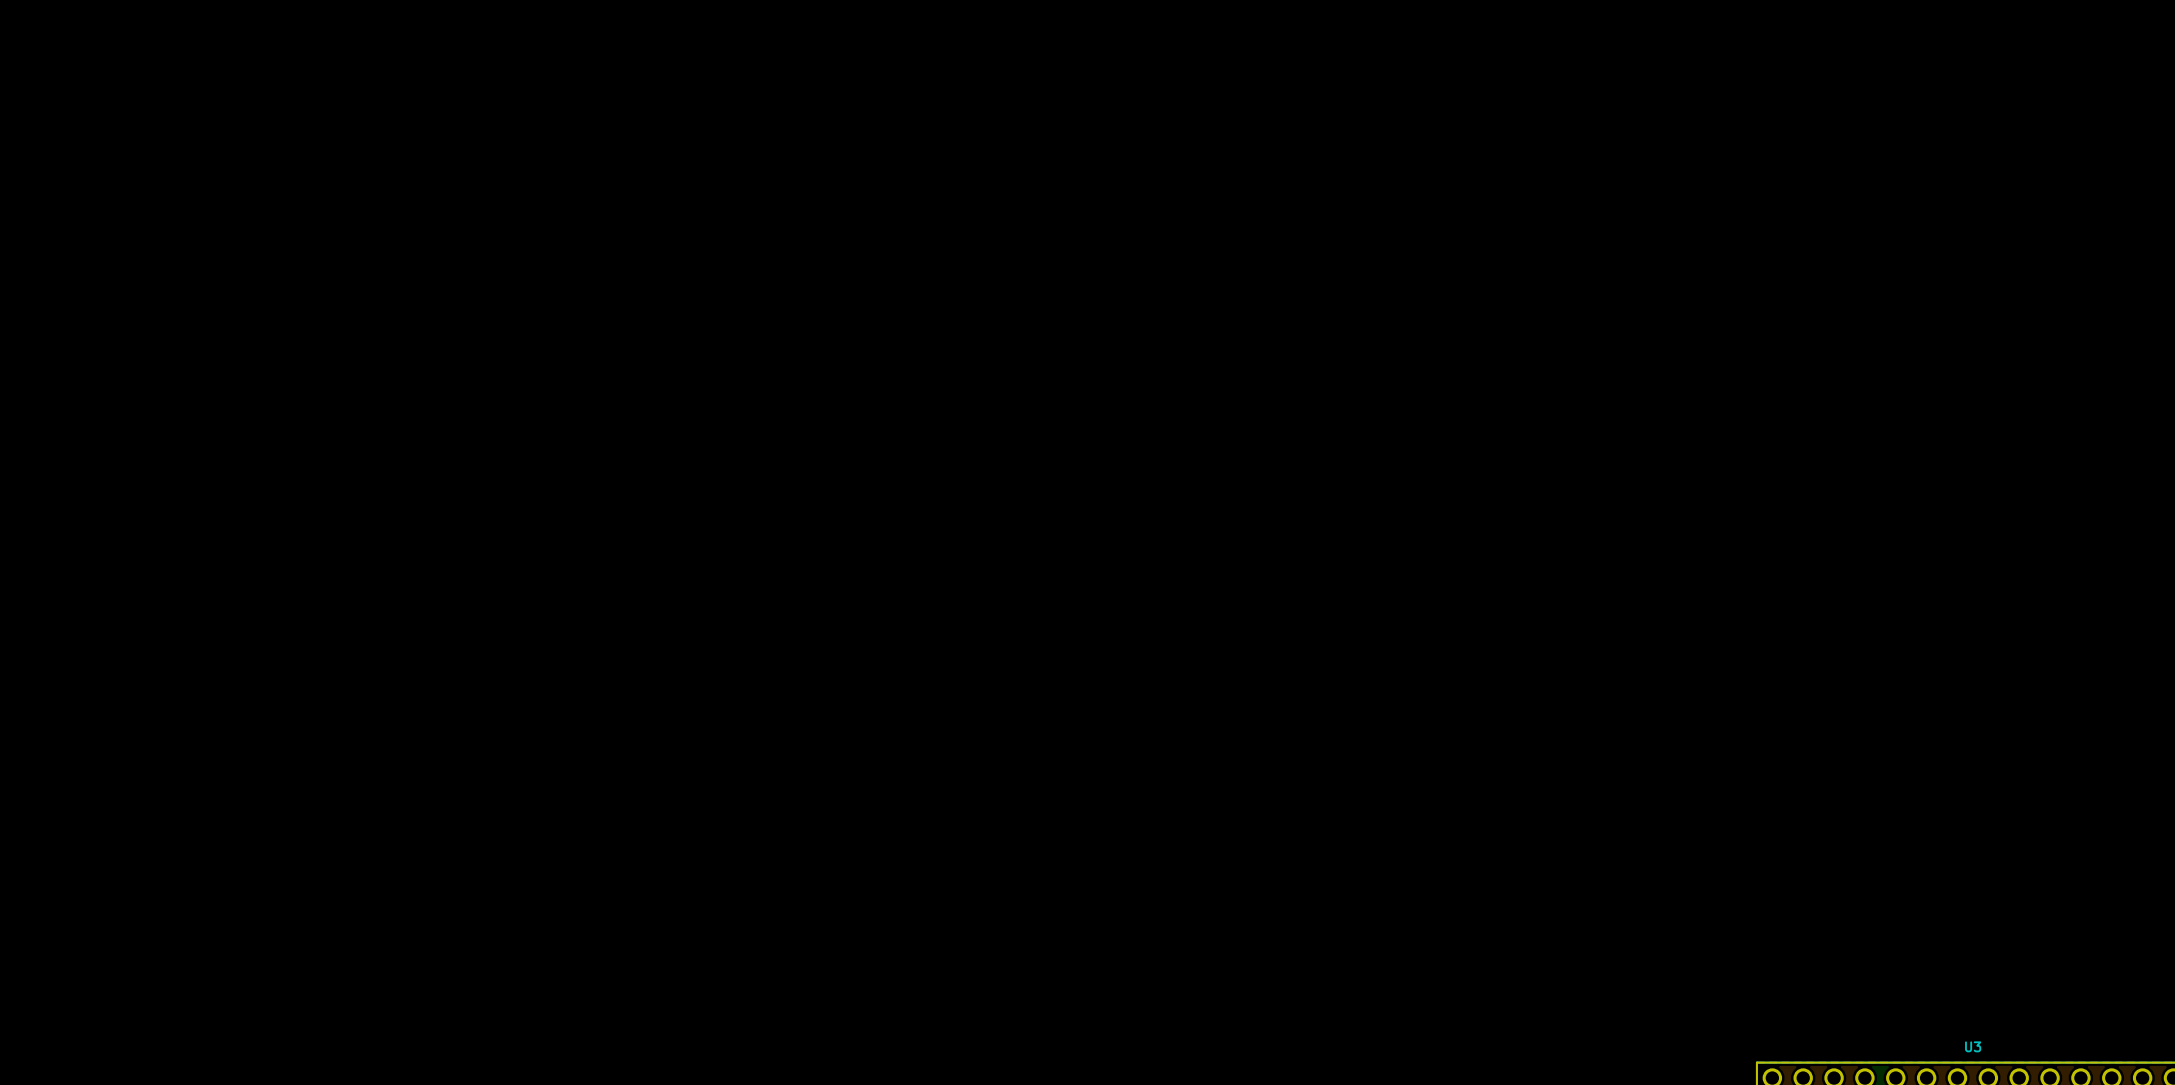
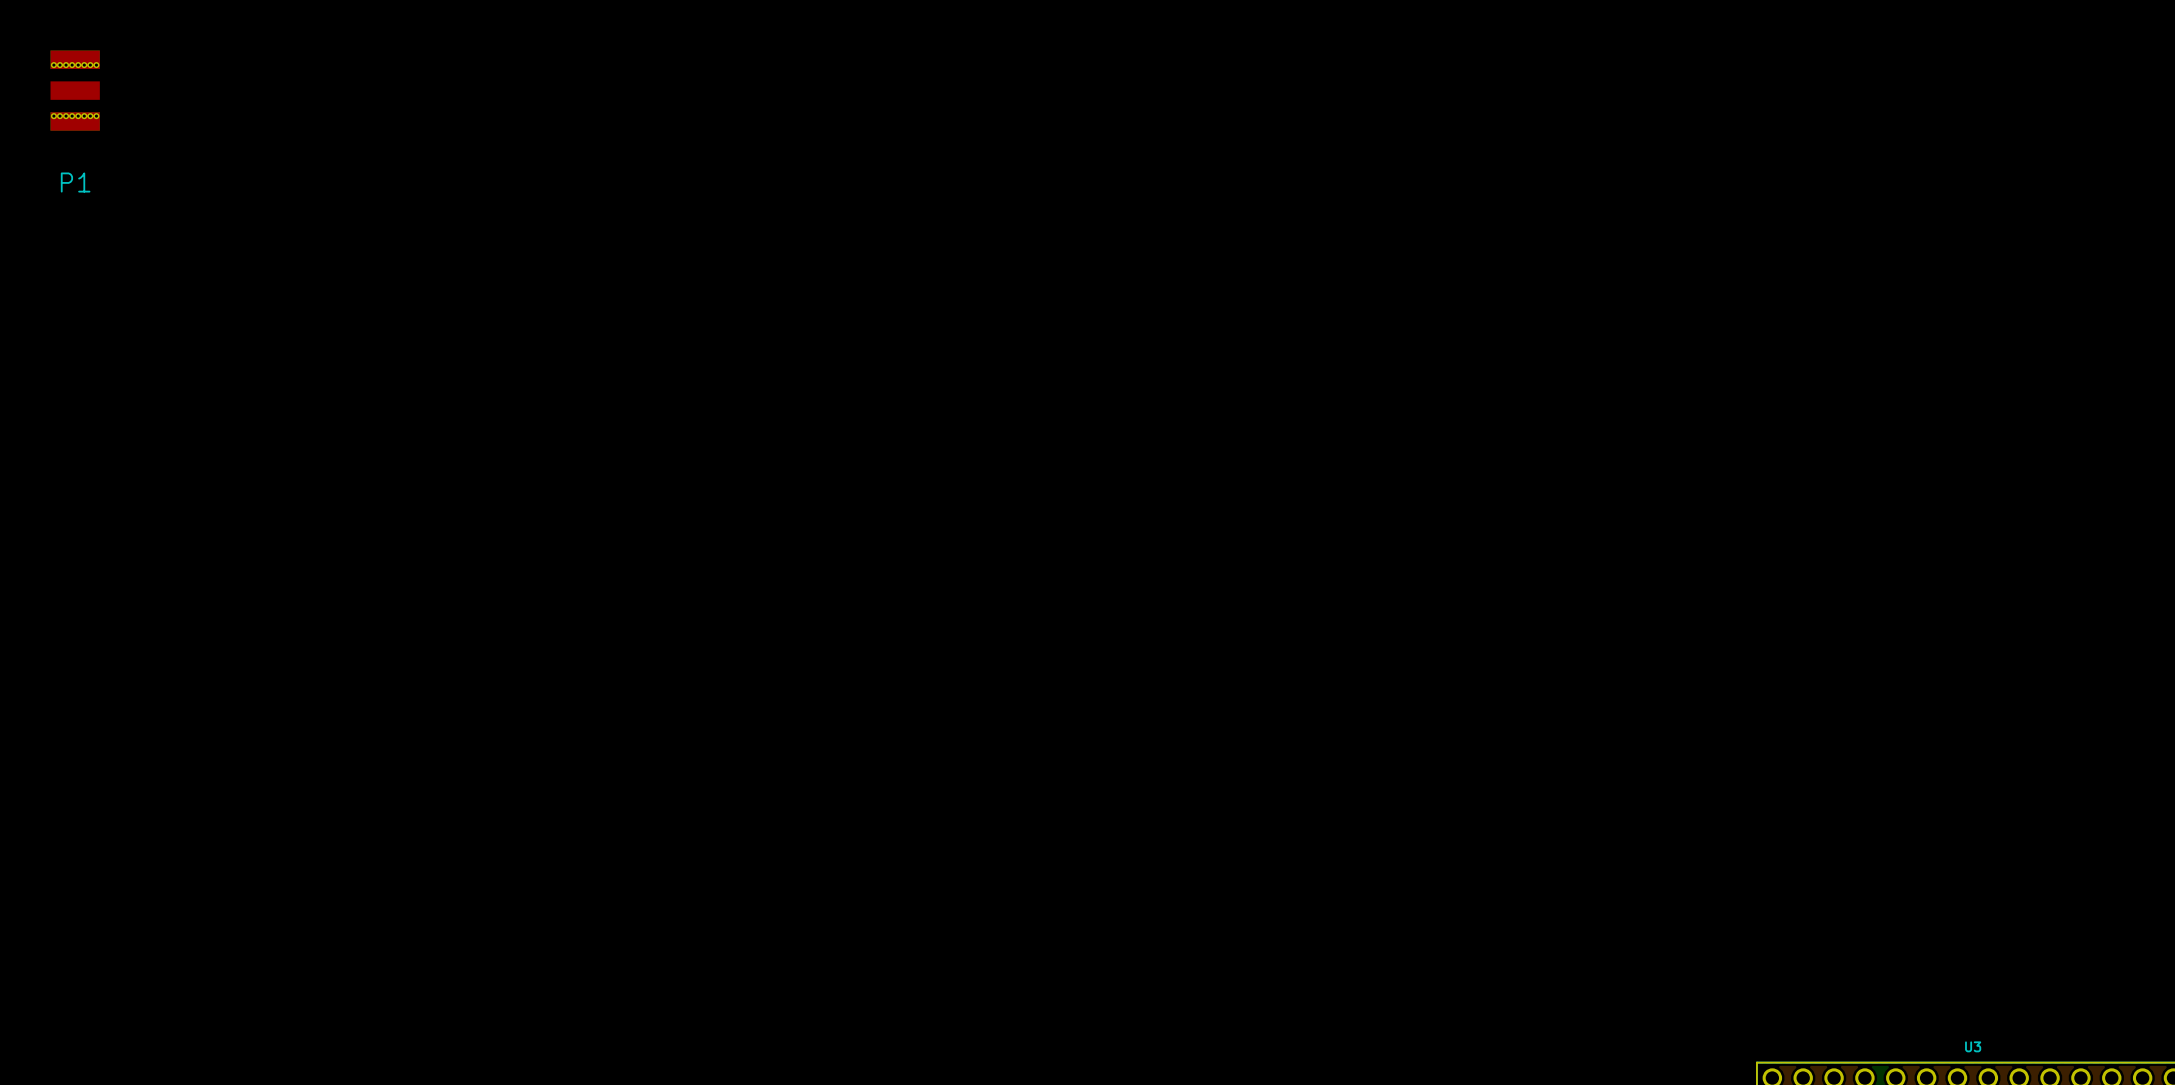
P1: none -> (75, 90)

